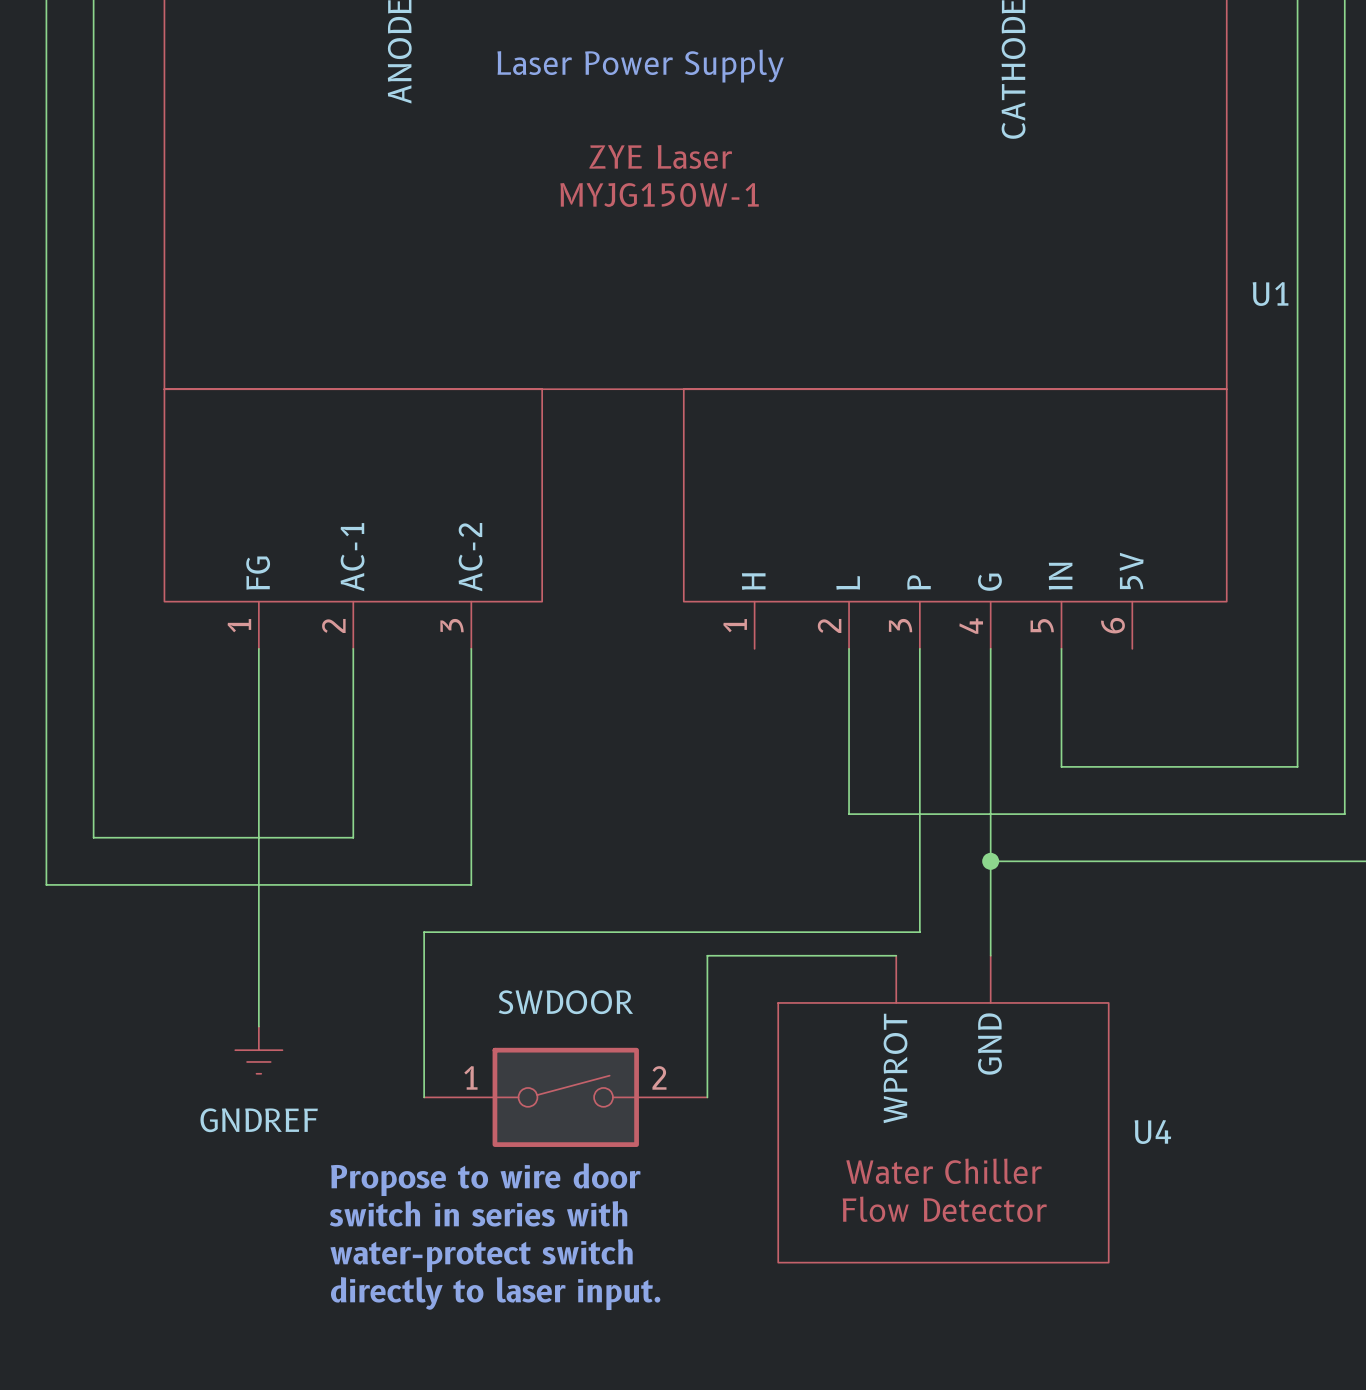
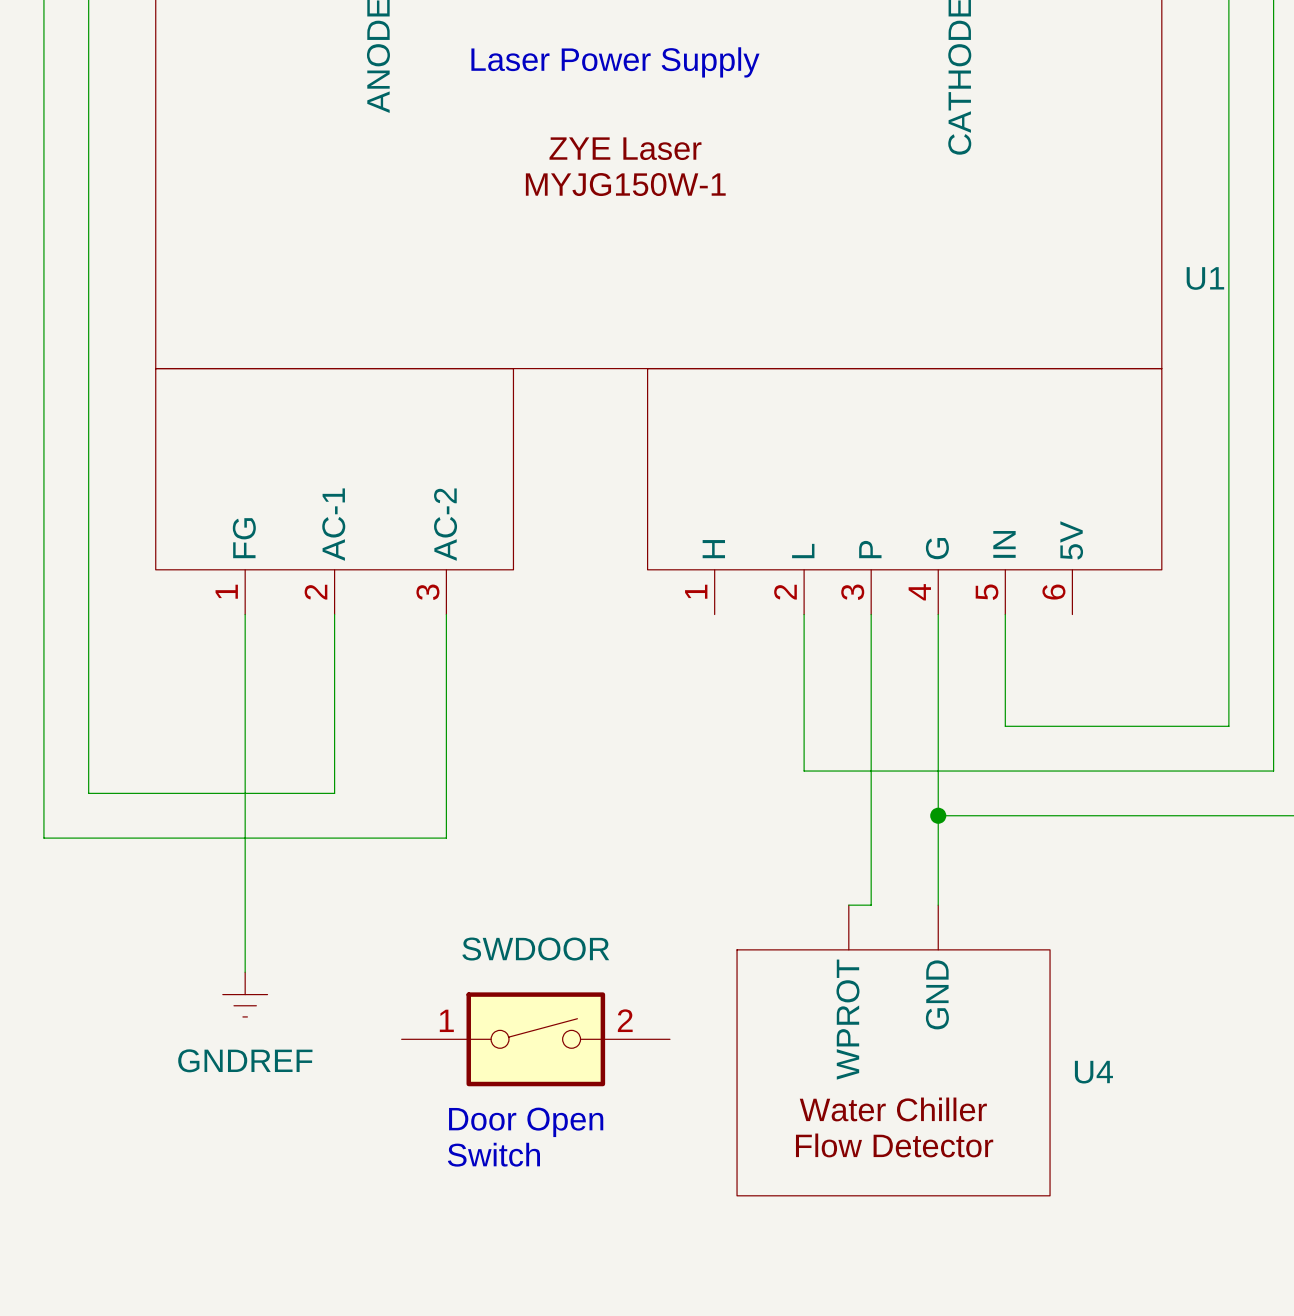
wire: (919, 932) (424, 932) (424, 1097) -> none
wire: (896, 955) (707, 955) (707, 1097) -> (848, 905) (871, 905) (871, 882)
text: Propose to wire door (485, 1179) -> none
text: none -> Door Open (526, 1122)
text: switch in series with (478, 1213) -> none
text: none -> Switch (493, 1154)
text: water-protect switch (481, 1255) -> none
text: directly to laser input. (495, 1293) -> none

